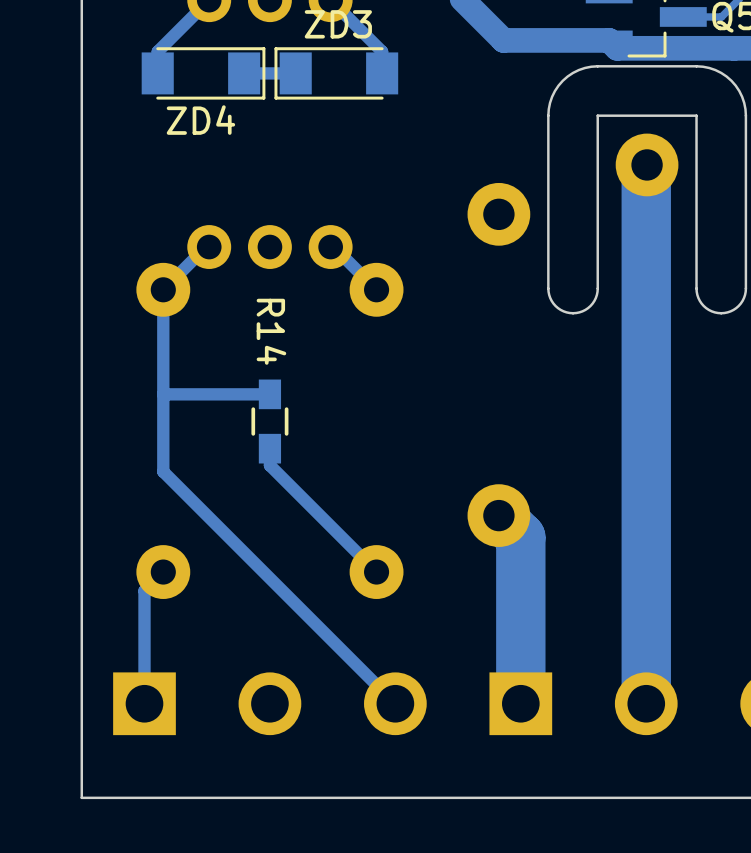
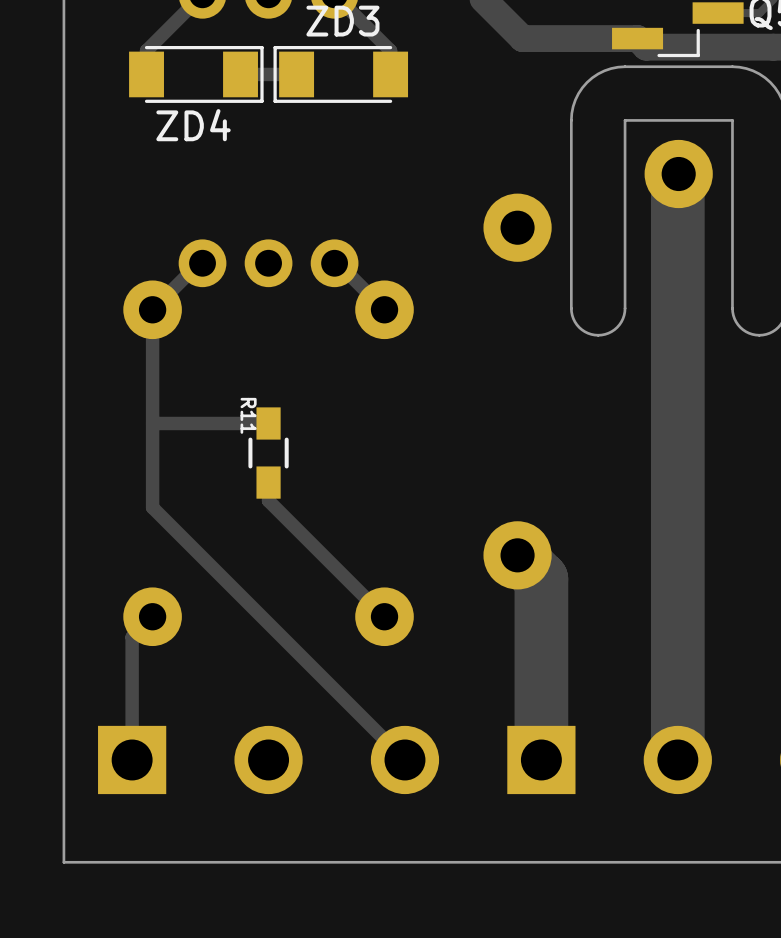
R14 name: R14 (271, 331) -> R11 (248, 415)

